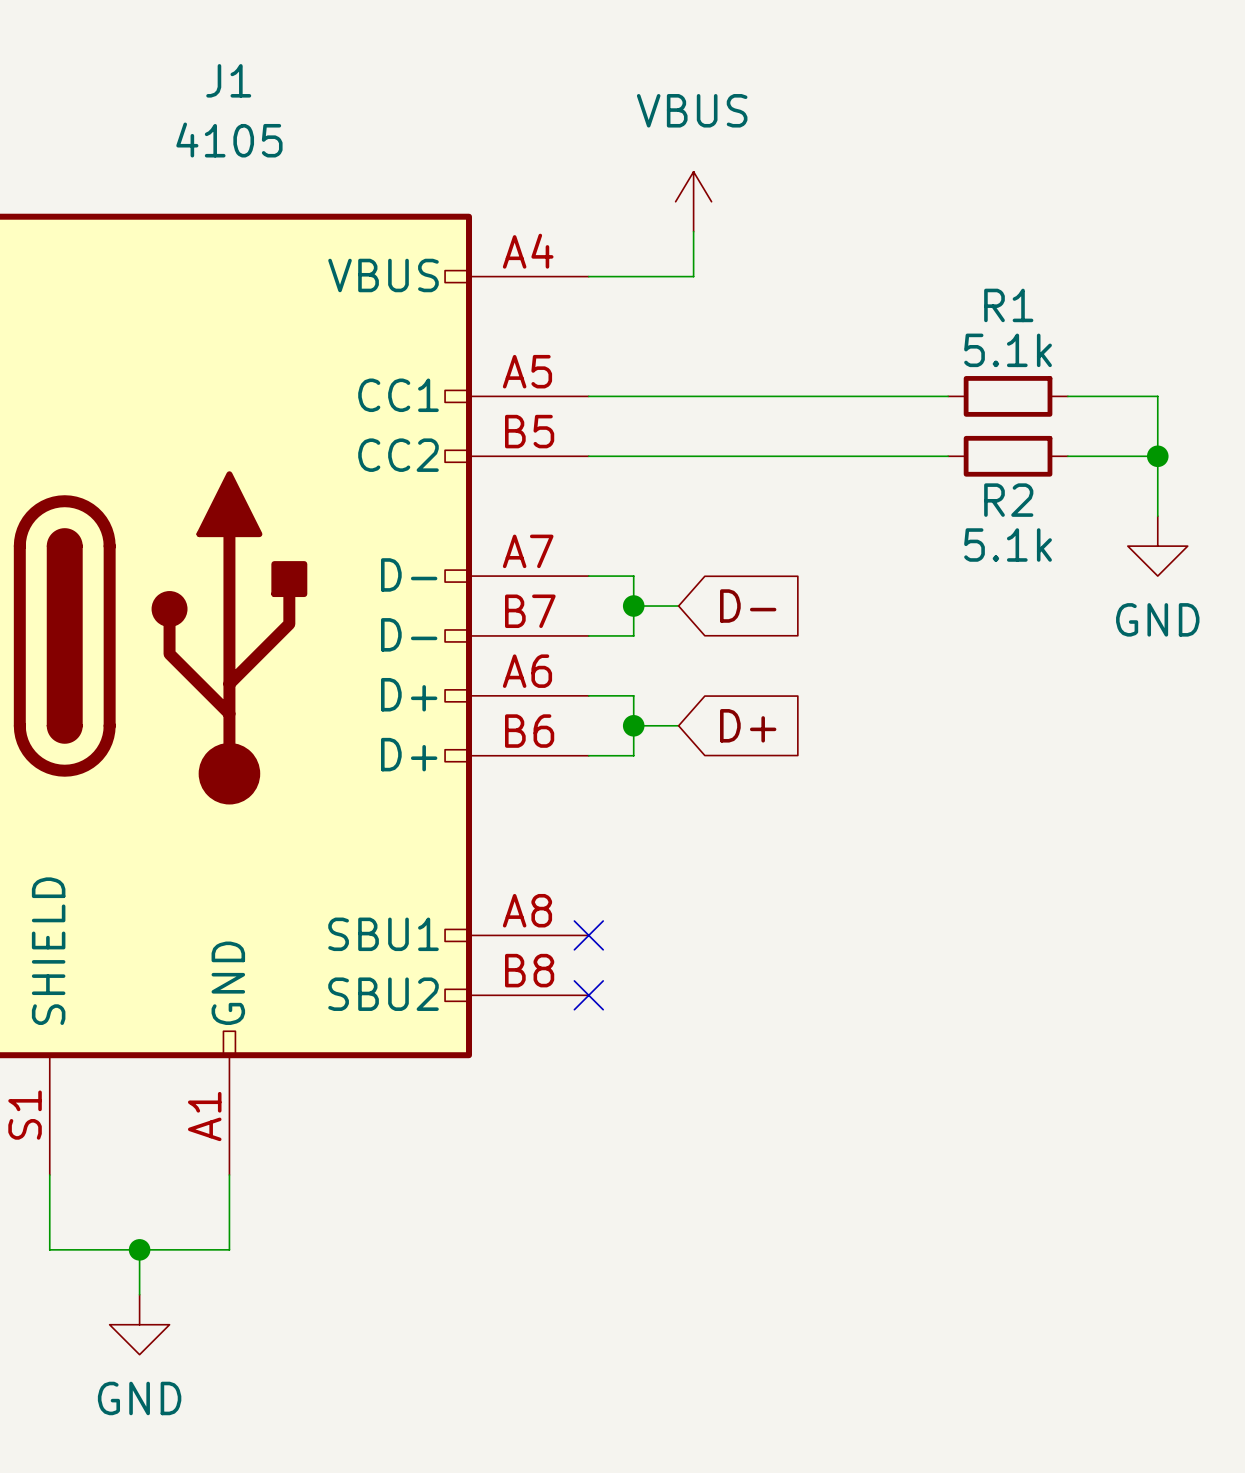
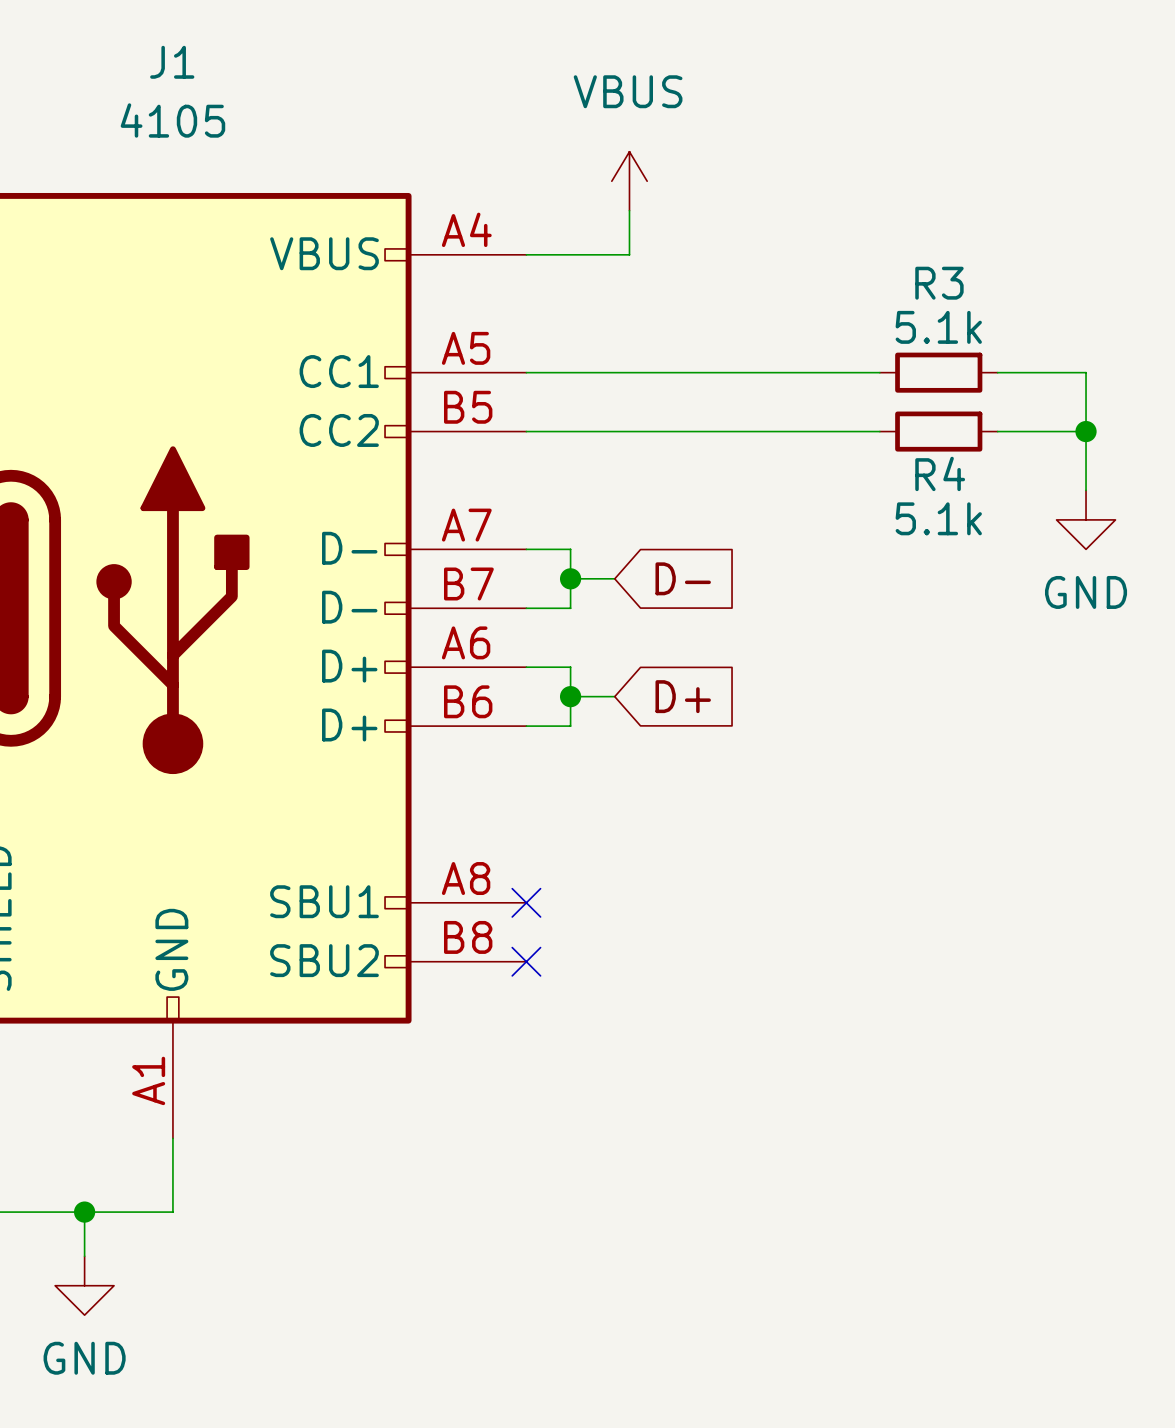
R1 name: R1 (1008, 305) -> R3 (939, 283)
R2 name: R2 (1008, 500) -> R4 (940, 473)

